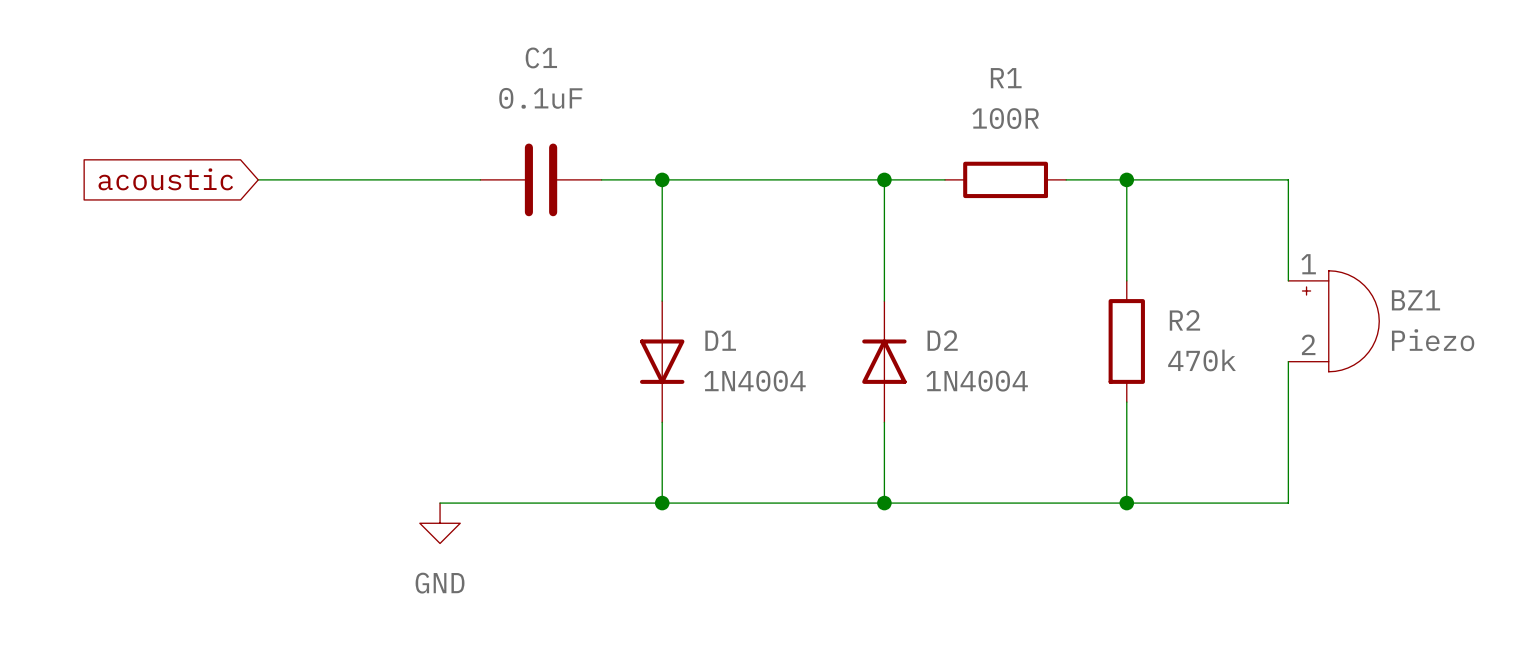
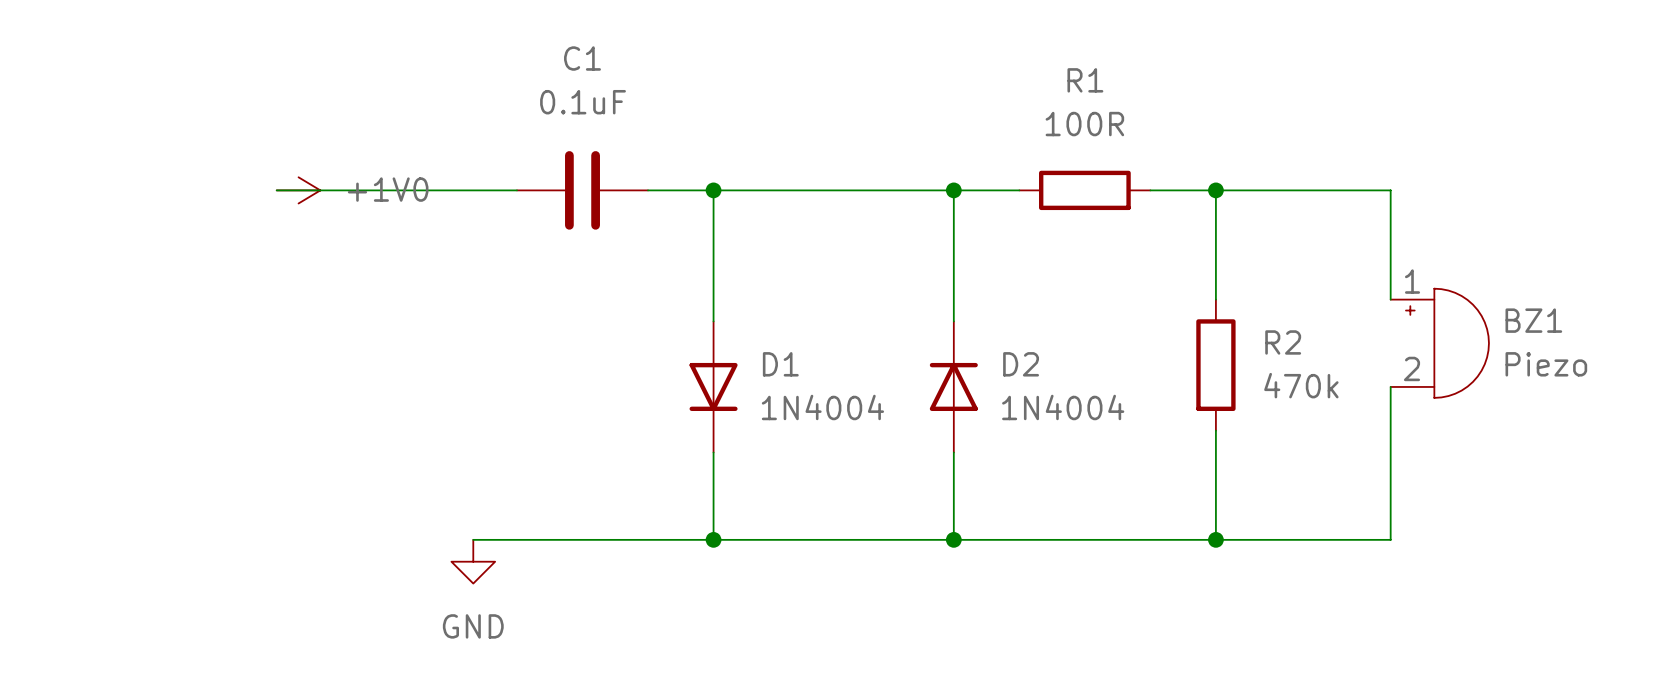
global label: acoustic (165, 179) -> none
power symbol: none -> +1V0 (298, 190)

